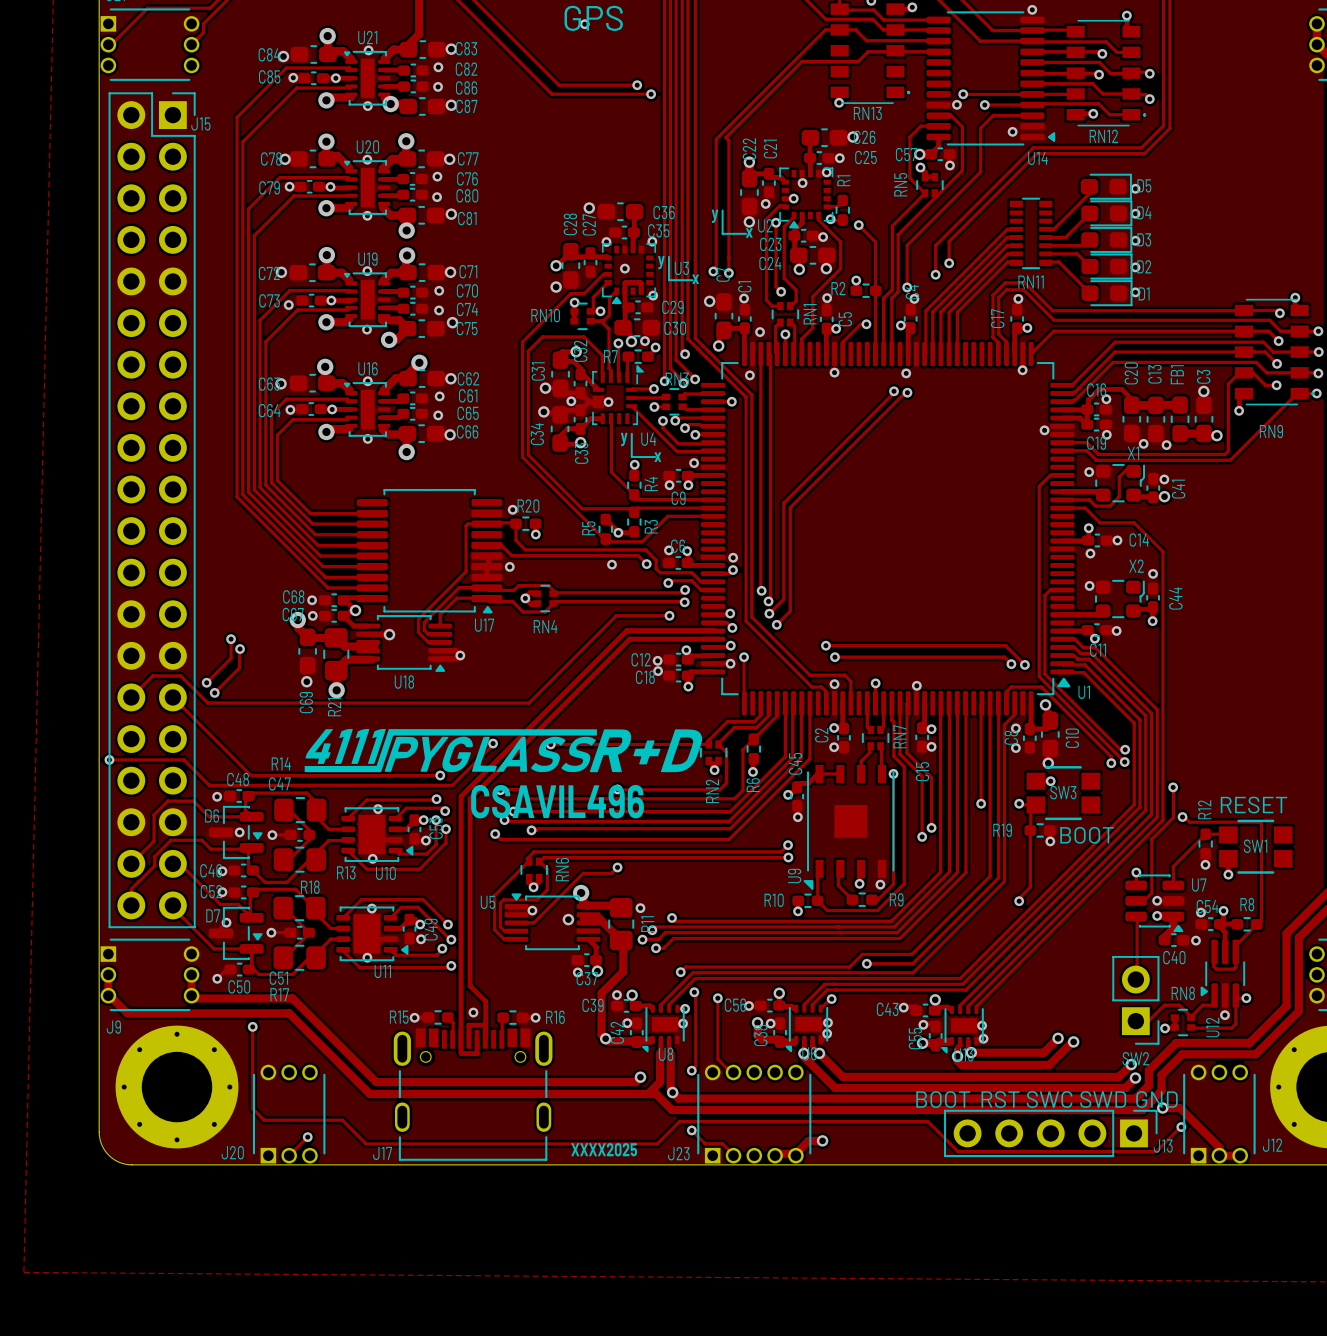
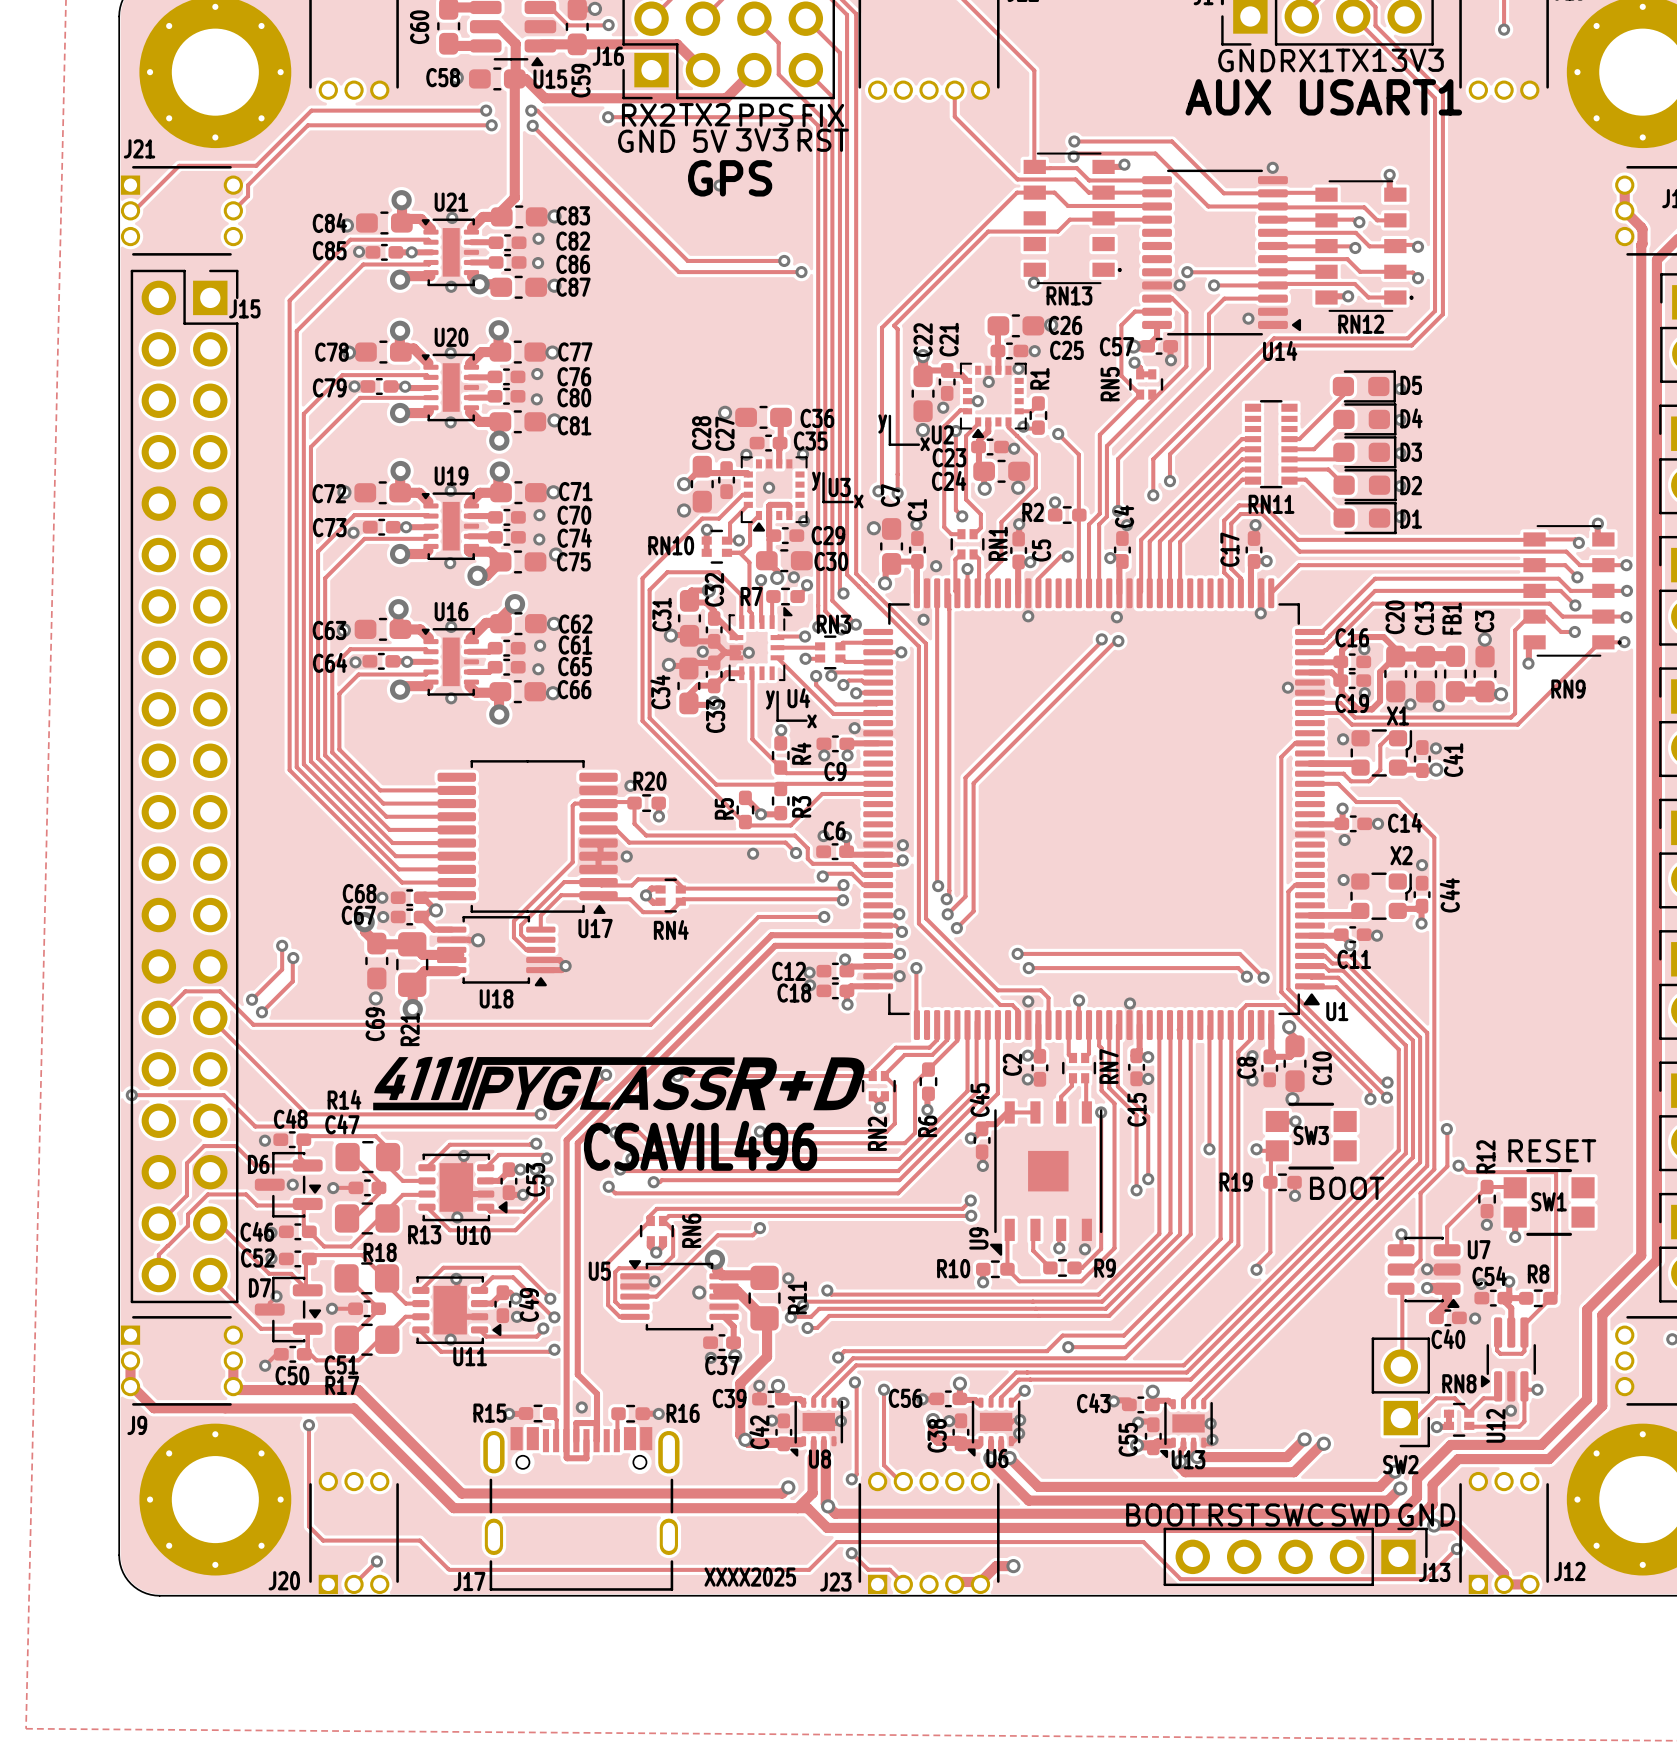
track: none -> (1395, 656) (1380, 672) (1380, 701) (1371, 709) (1358, 709) (1341, 692) (1341, 681)

